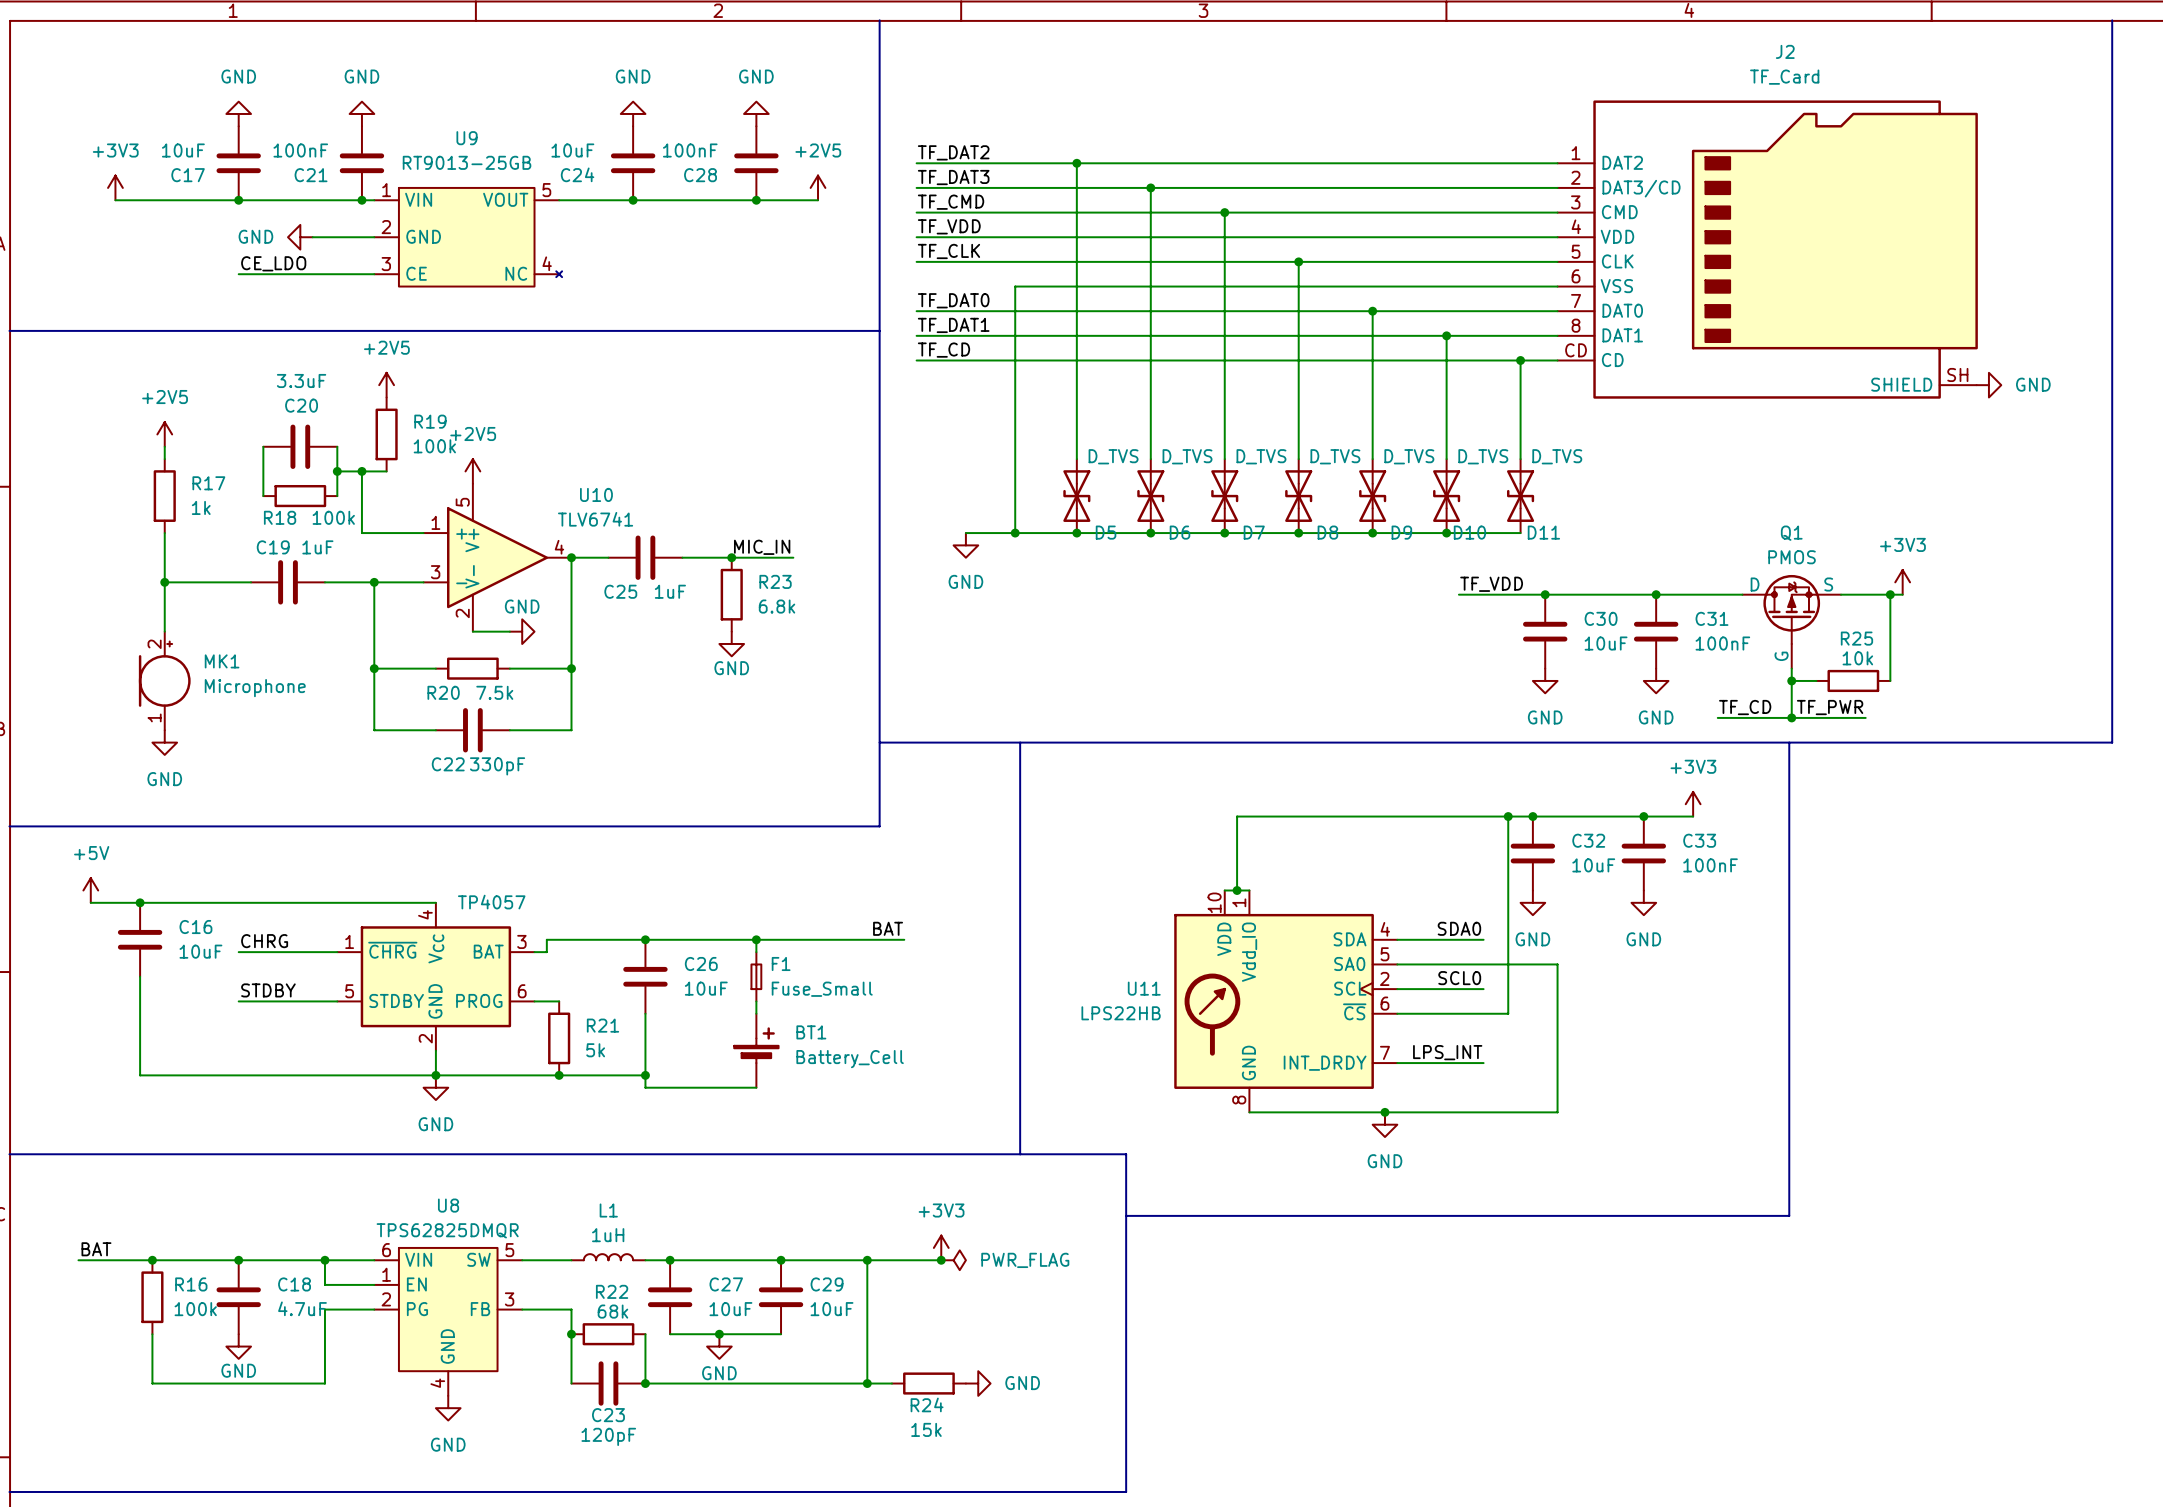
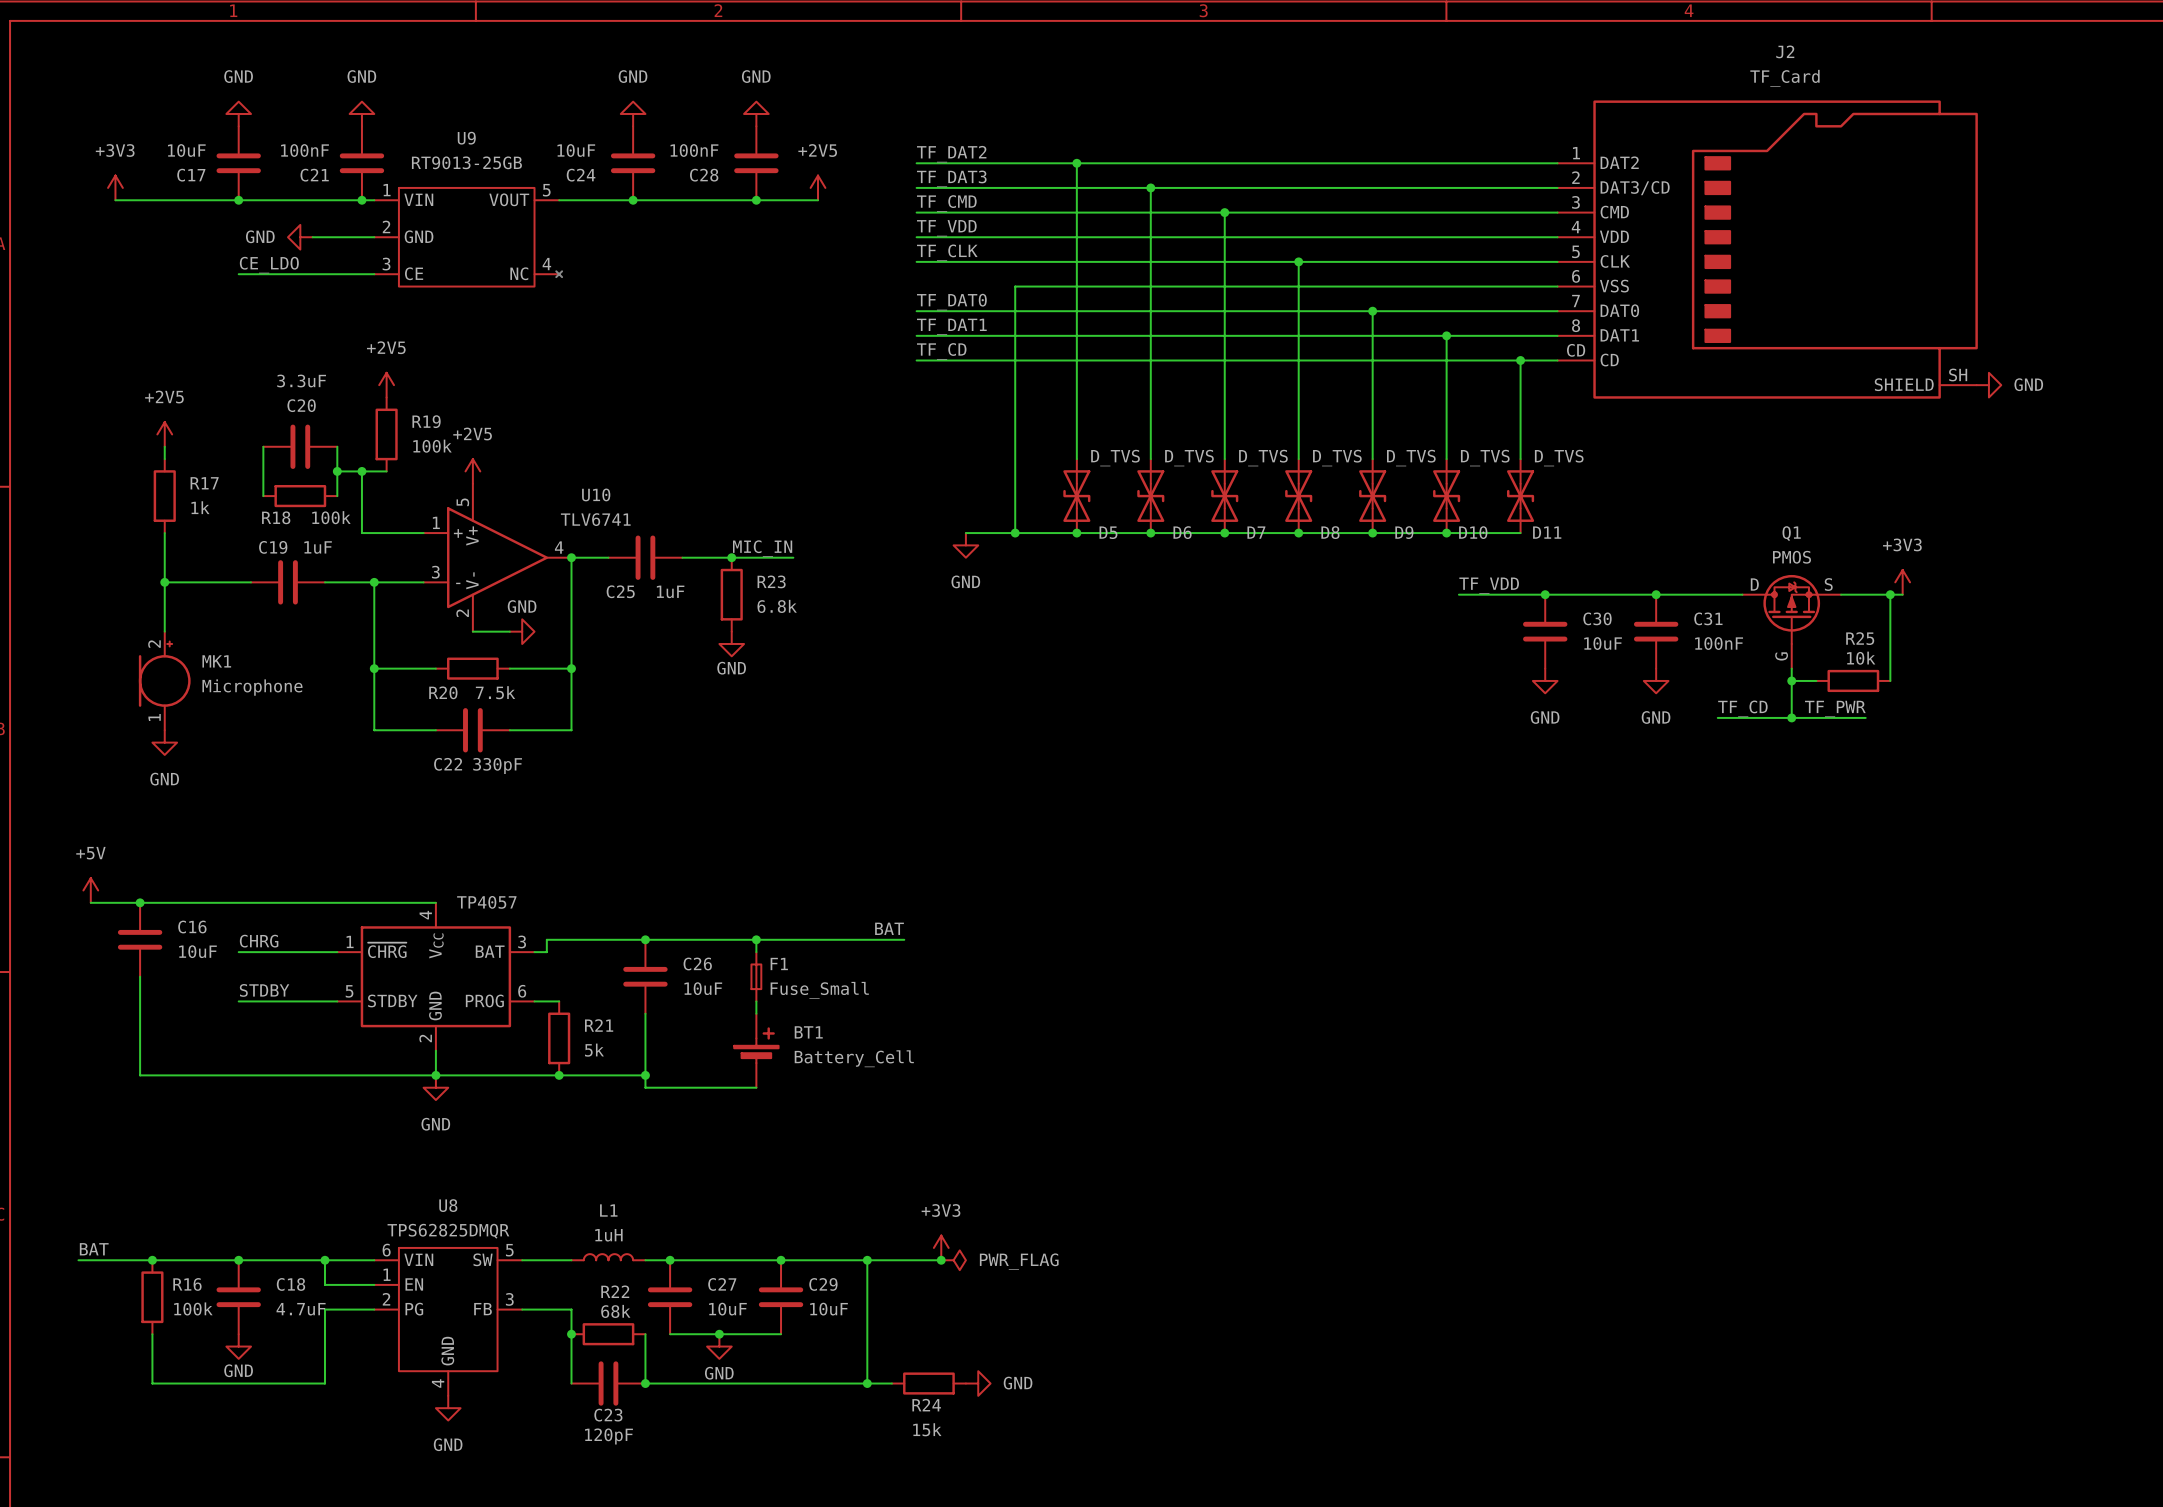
line: (879, 20) (879, 826) (9, 826) -> none
line: (2112, 20) (2112, 742) (879, 742) -> none
line: (9, 330) (879, 330) -> none
line: (1020, 742) (1020, 1154) -> none
line: (1789, 742) (1789, 1215) (1126, 1215) -> none
power symbol: +3V3 (1693, 804) -> none
wire: (1508, 816) (1508, 1013) (1397, 1013) -> none
junction: (1508, 816) -> none
junction: (1532, 816) -> none
junction: (1643, 816) -> none
wire: (1693, 816) (1237, 816) (1237, 890) -> none
C32: 10uF (1532, 853) -> none
C33: 100nF (1643, 853) -> none
wire: (1224, 890) (1249, 890) -> none
junction: (1237, 890) -> none
power symbol: GND (1532, 902) -> none
power symbol: GND (1643, 902) -> none
label: SDA0 (1459, 928) -> none
wire: (1397, 939) (1483, 939) -> none
wire: (1397, 964) (1557, 964) (1557, 1112) (1249, 1112) -> none
label: SCL0 (1459, 978) -> none
wire: (1397, 989) (1483, 989) -> none
U11: LPS22HB (1285, 1001) -> none
label: LPS_INT (1447, 1052) -> none
wire: (1397, 1063) (1483, 1063) -> none
junction: (1384, 1112) -> none
power symbol: GND (1384, 1124) -> none
line: (9, 1154) (1126, 1154) (1126, 1491) (9, 1491) -> none

